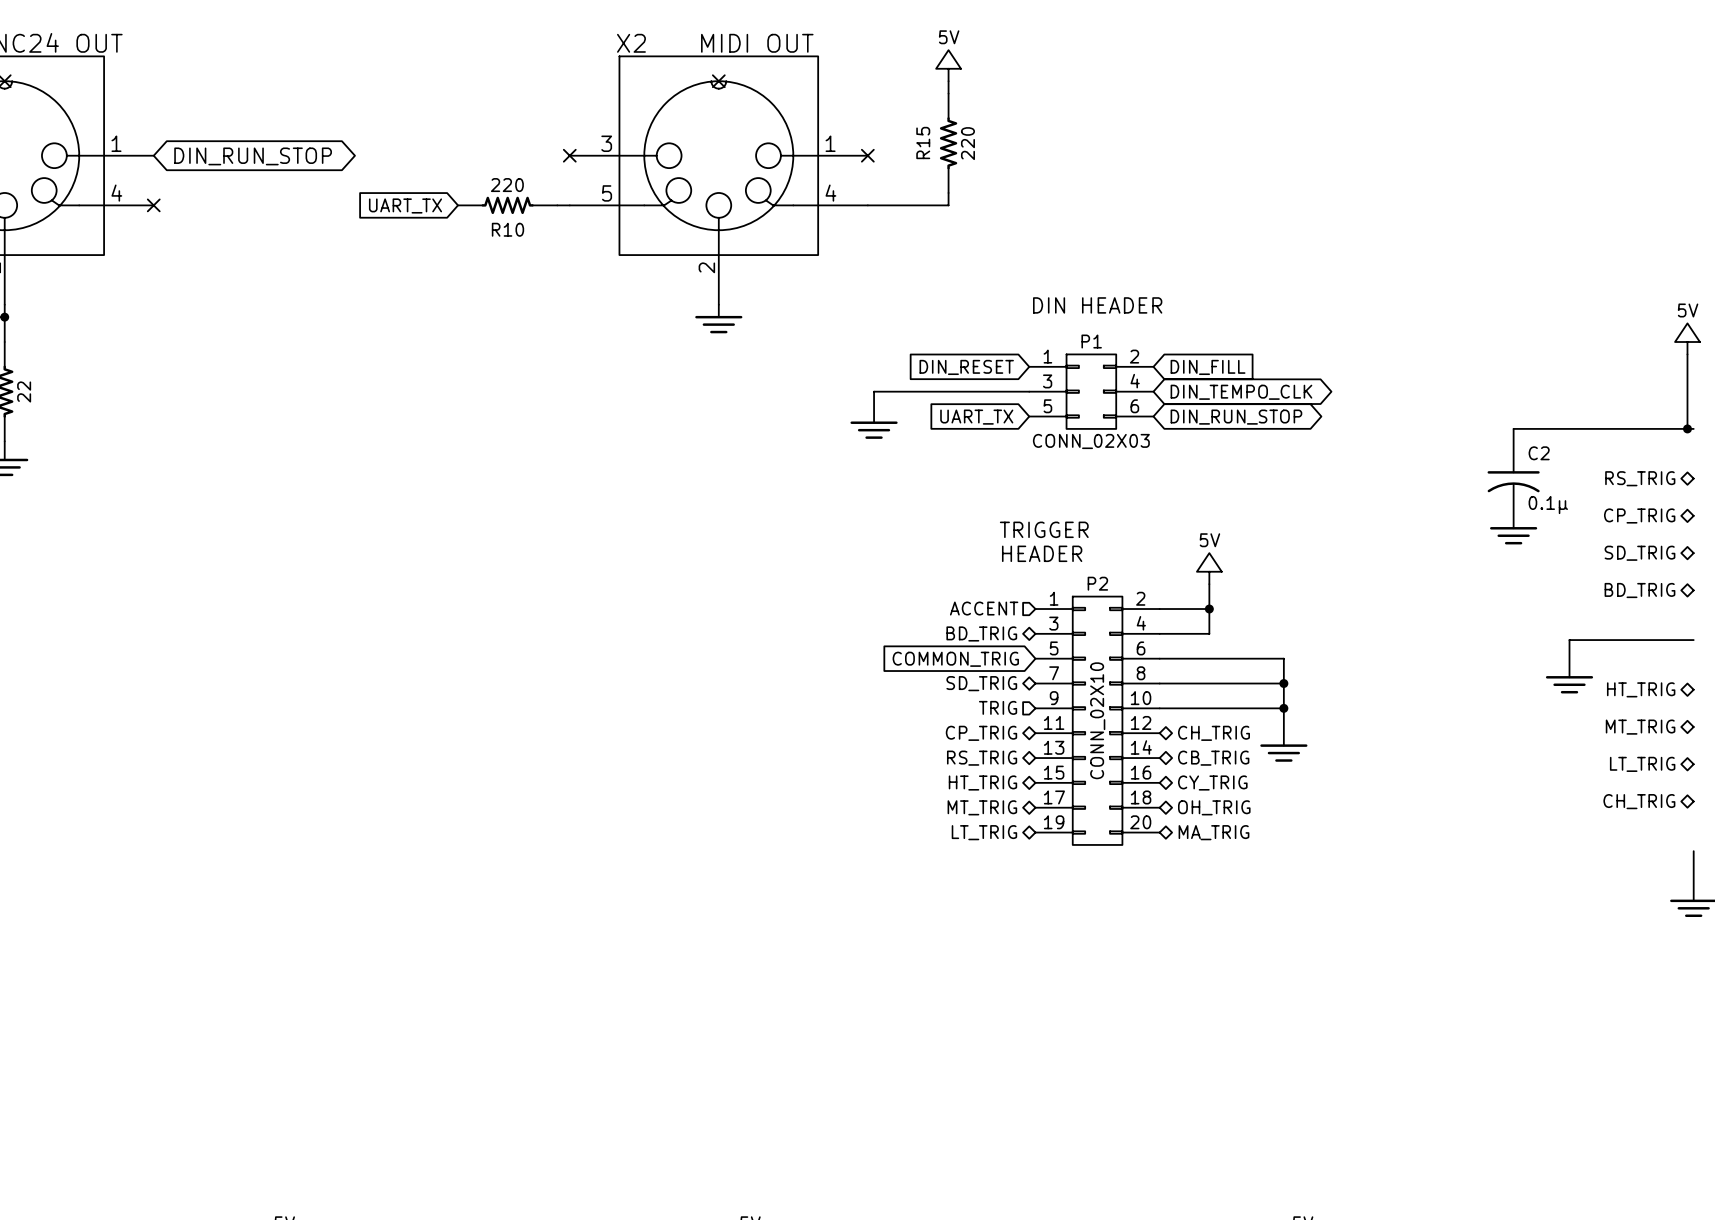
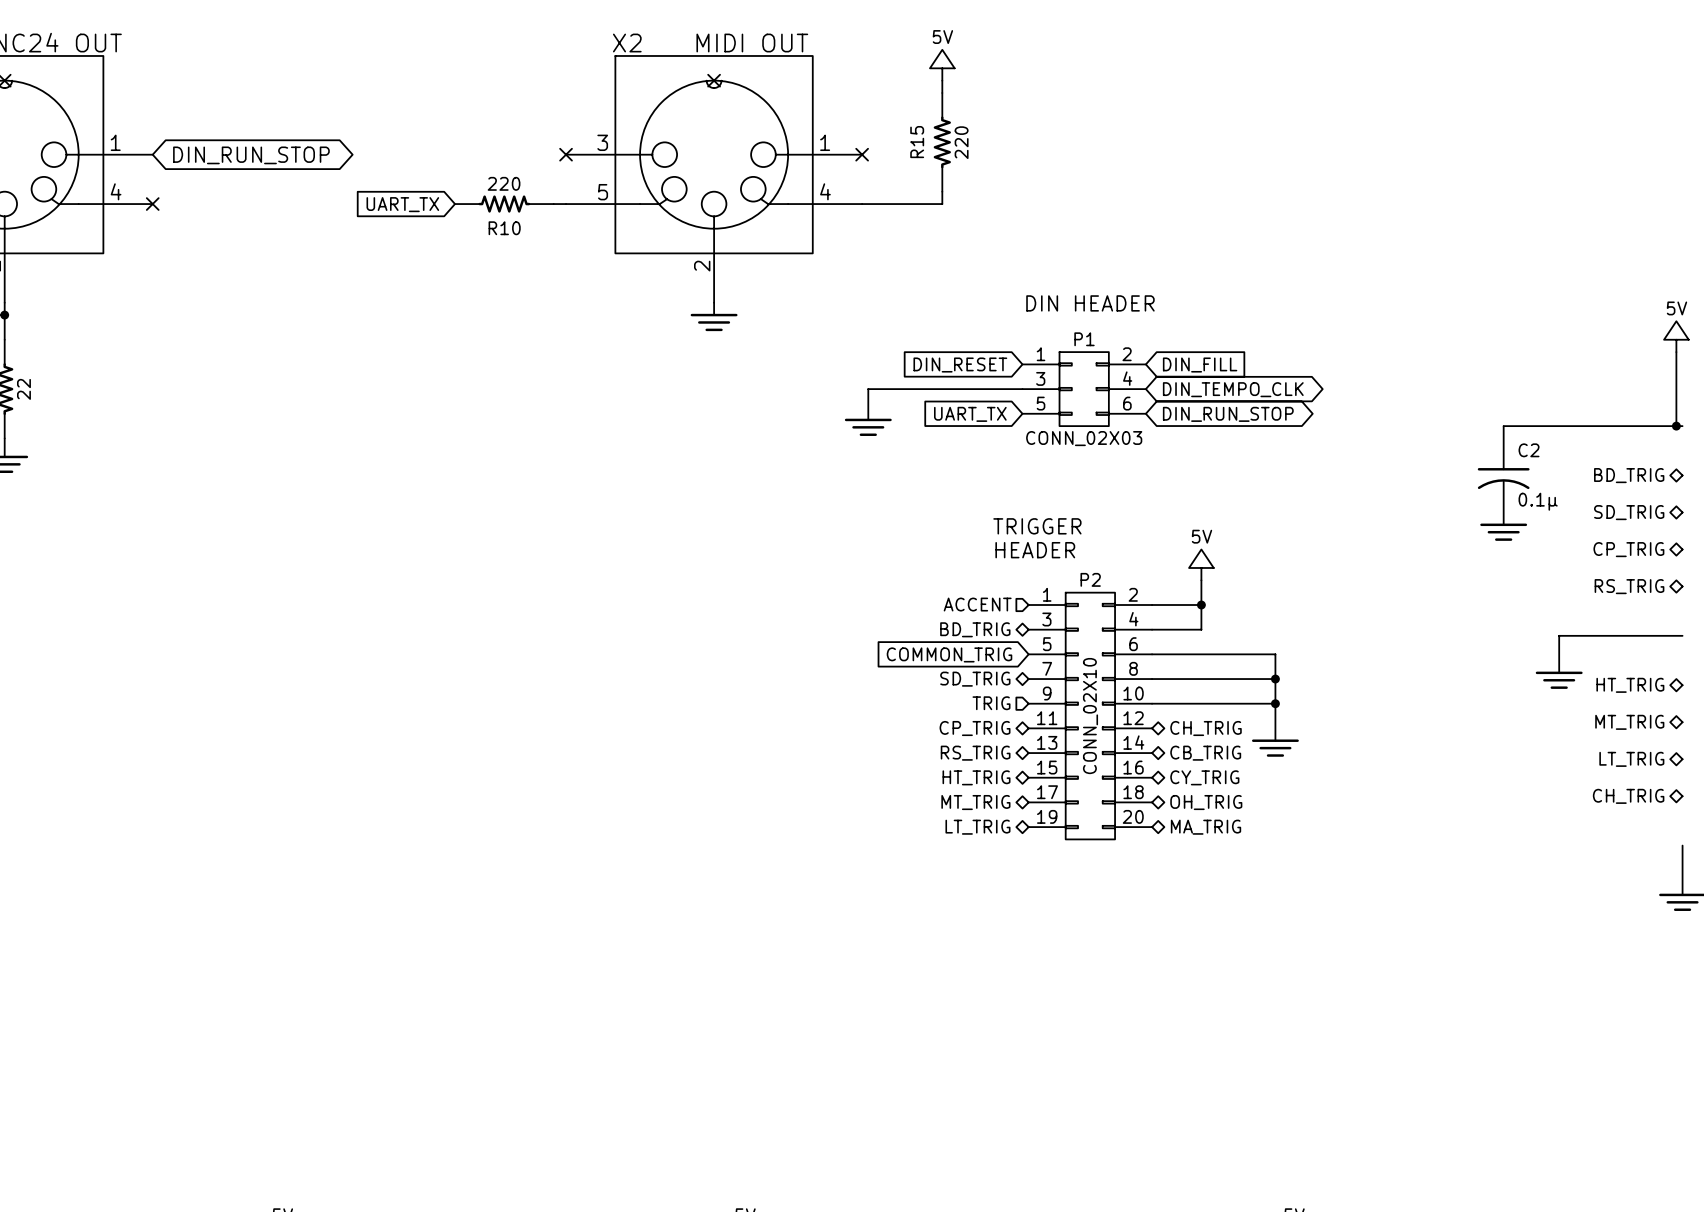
hierarchical label: RS_TRIG (1640, 478) -> BD_TRIG (1629, 475)
hierarchical label: CP_TRIG (1639, 515) -> SD_TRIG (1629, 512)
hierarchical label: SD_TRIG (1639, 553) -> CP_TRIG (1628, 549)
hierarchical label: BD_TRIG (1639, 590) -> RS_TRIG (1629, 586)

